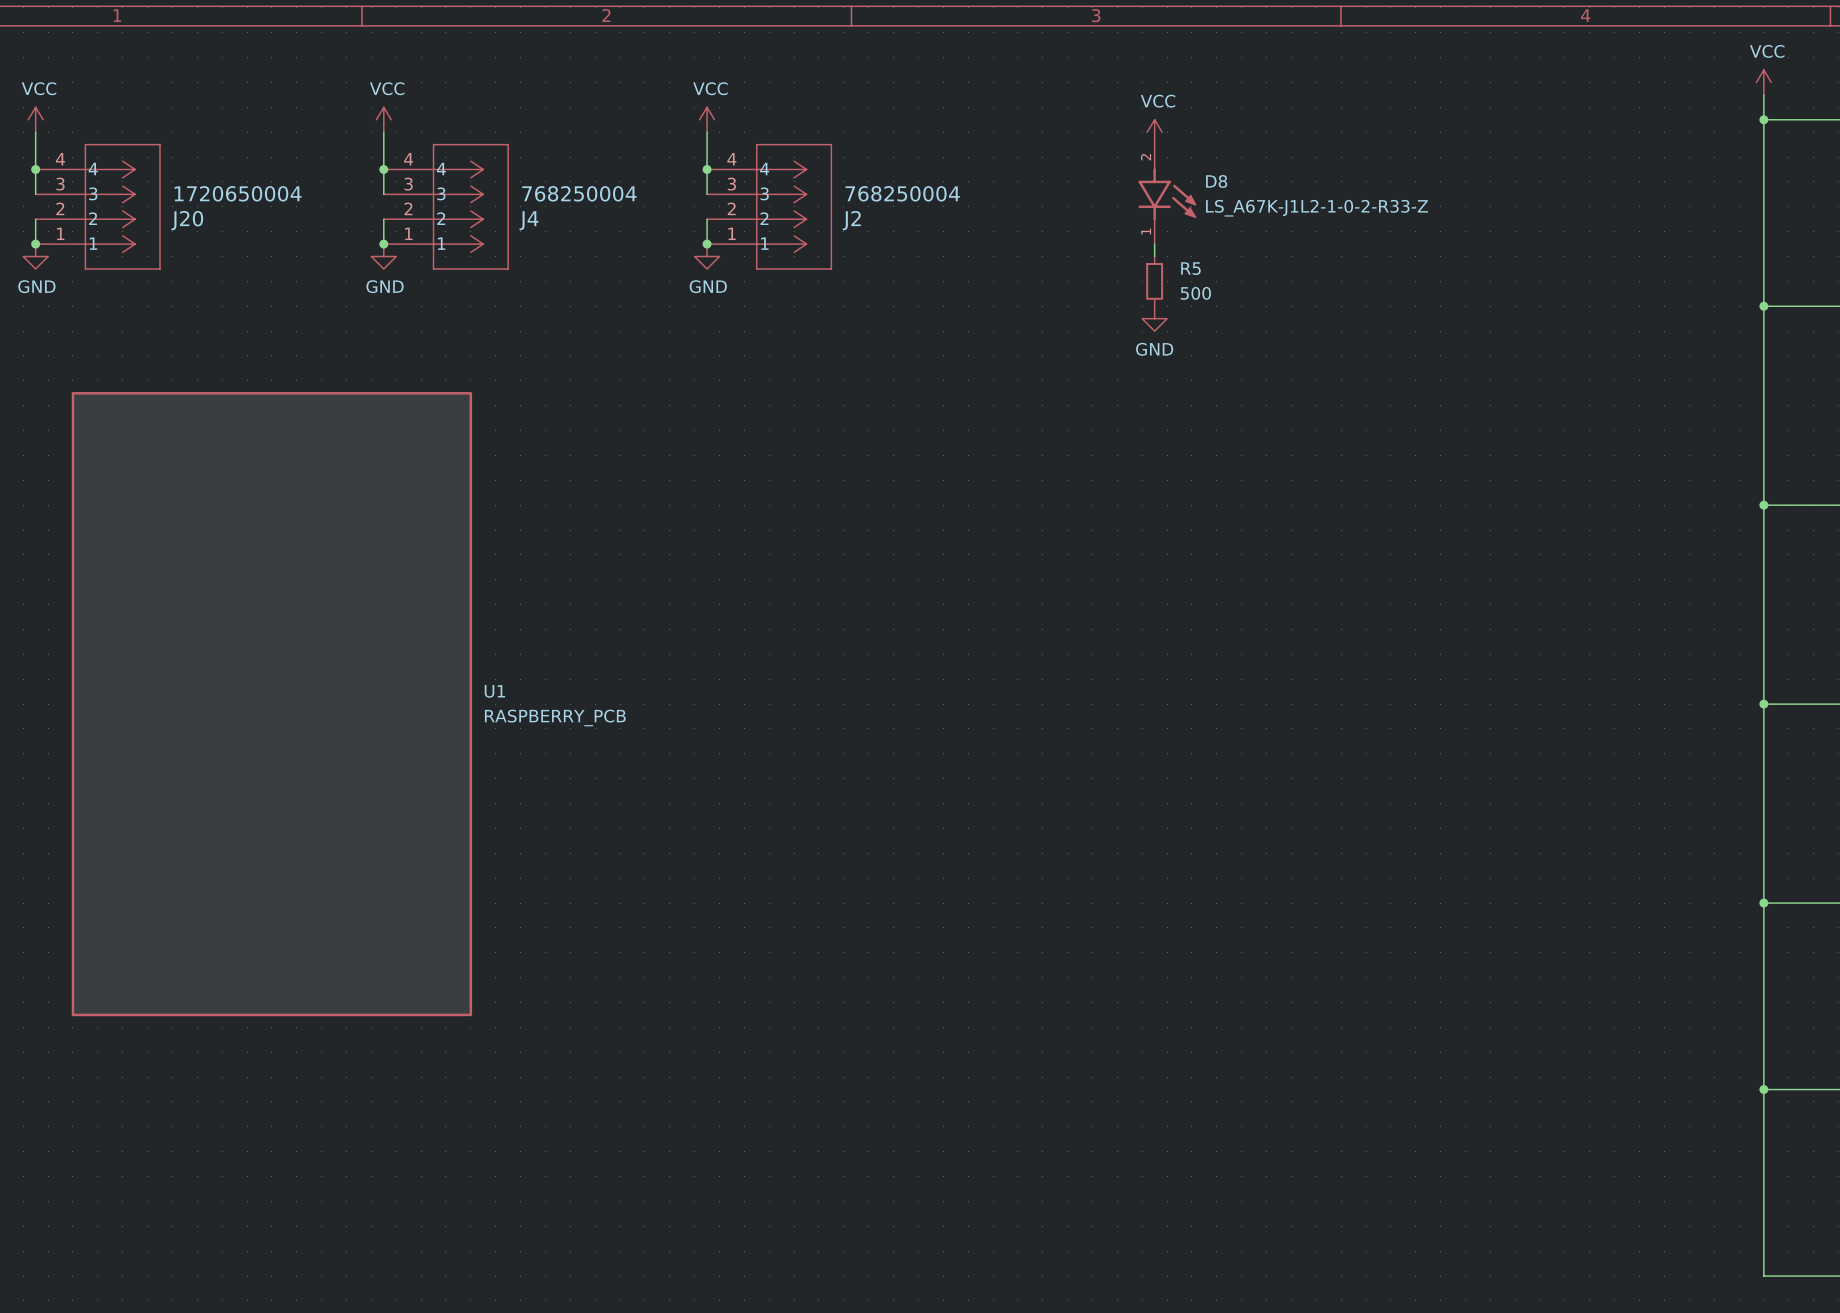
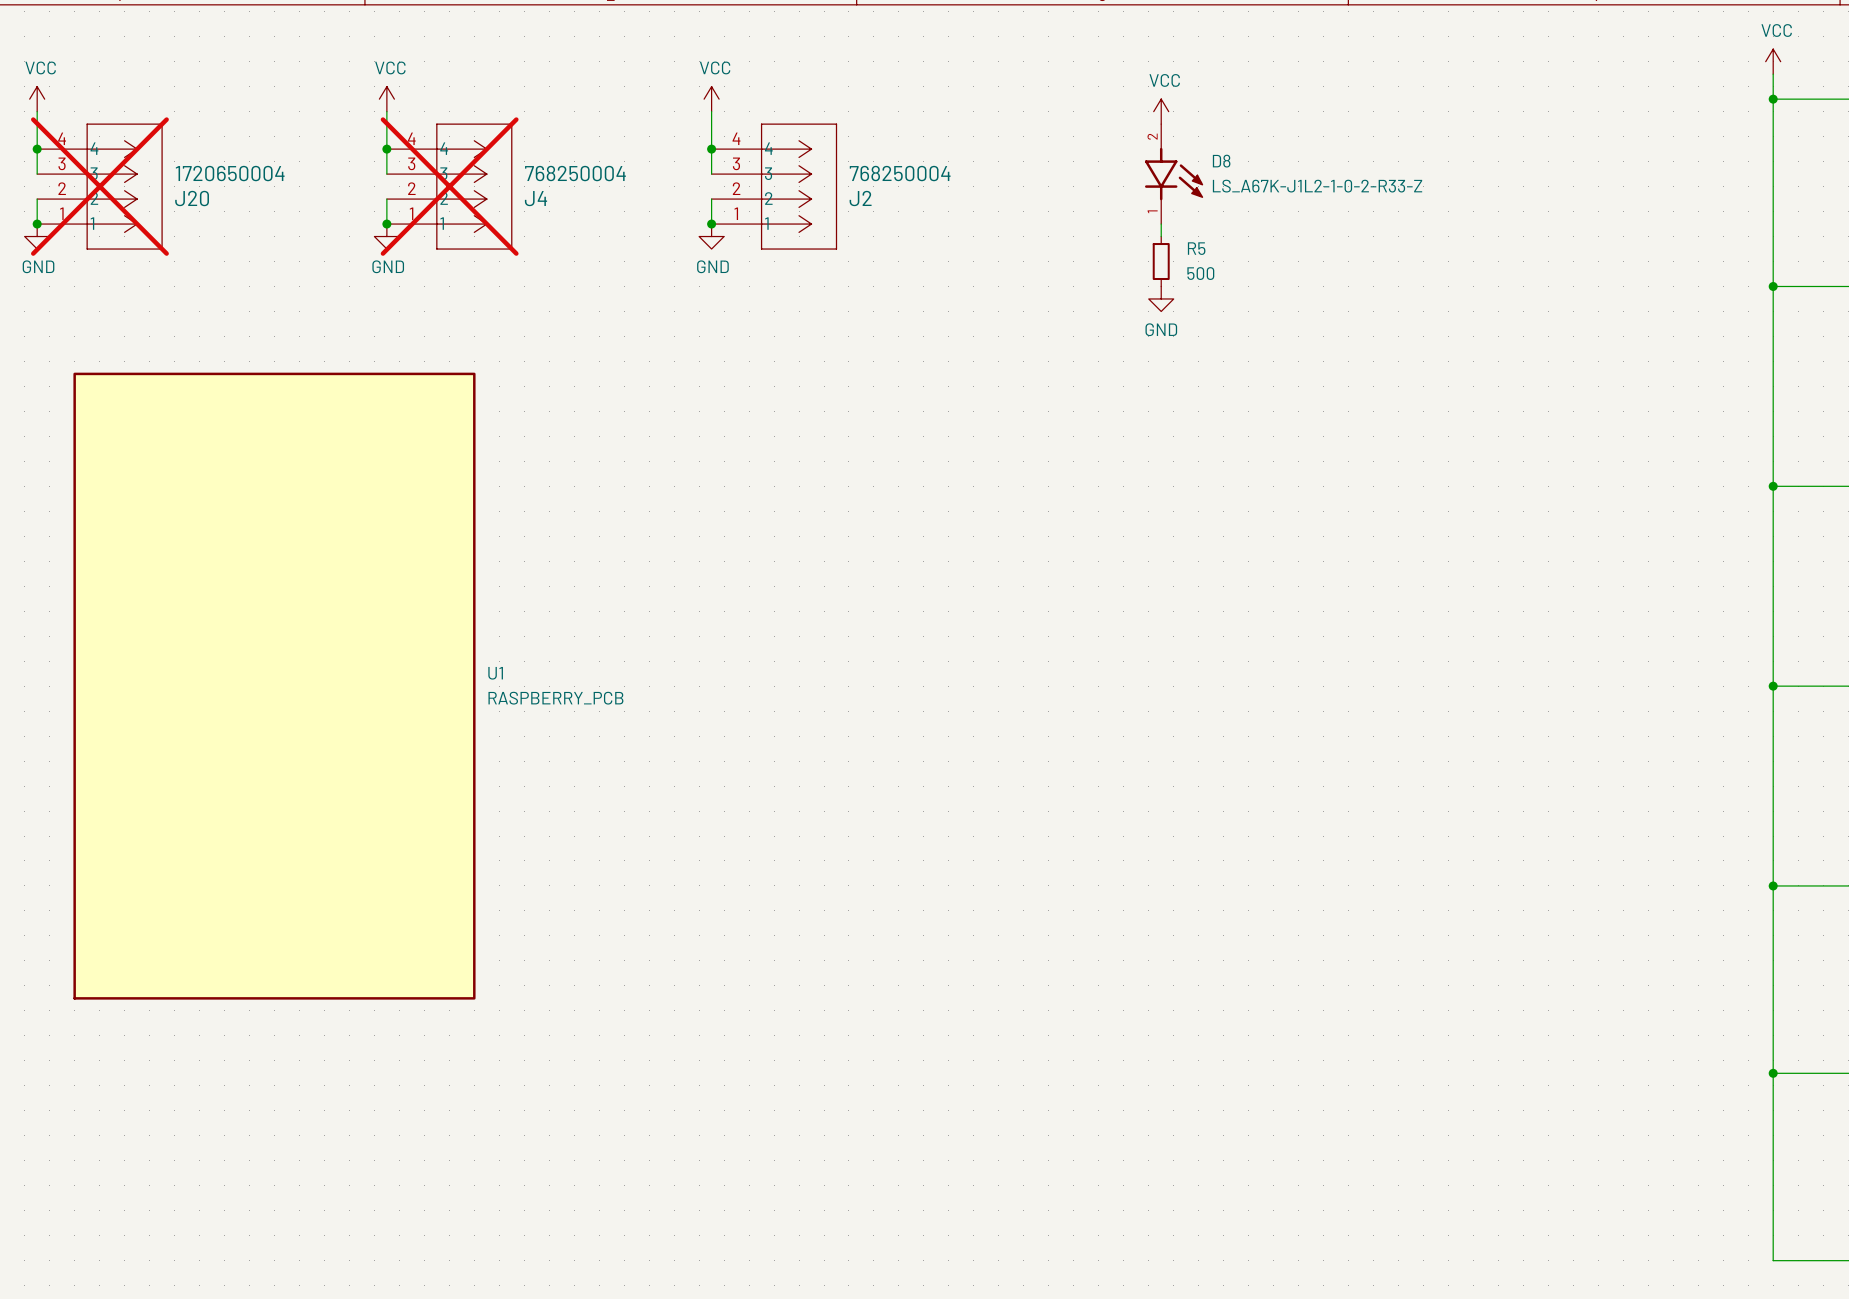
J20 do-not-place cross: none -> (99, 186)
J4 do-not-place cross: none -> (449, 186)

